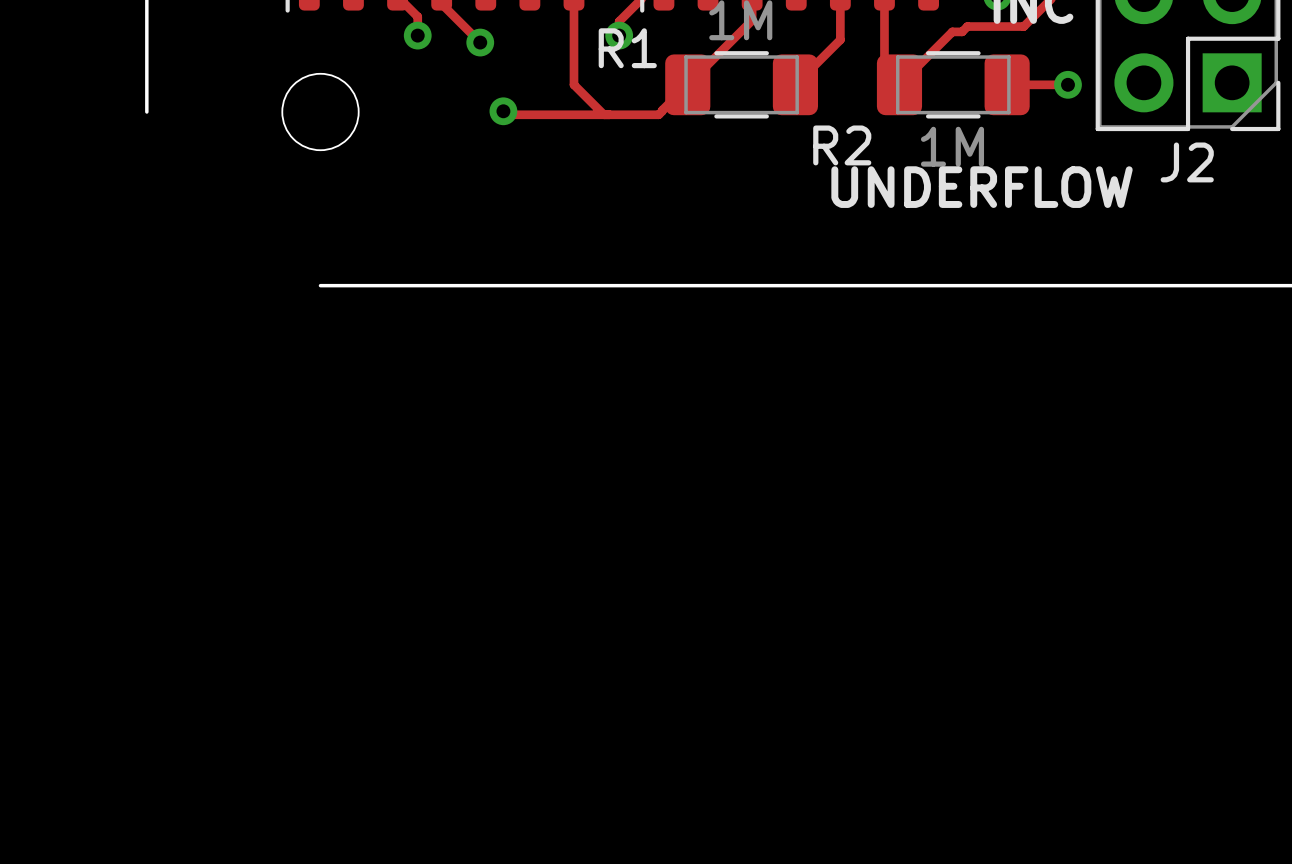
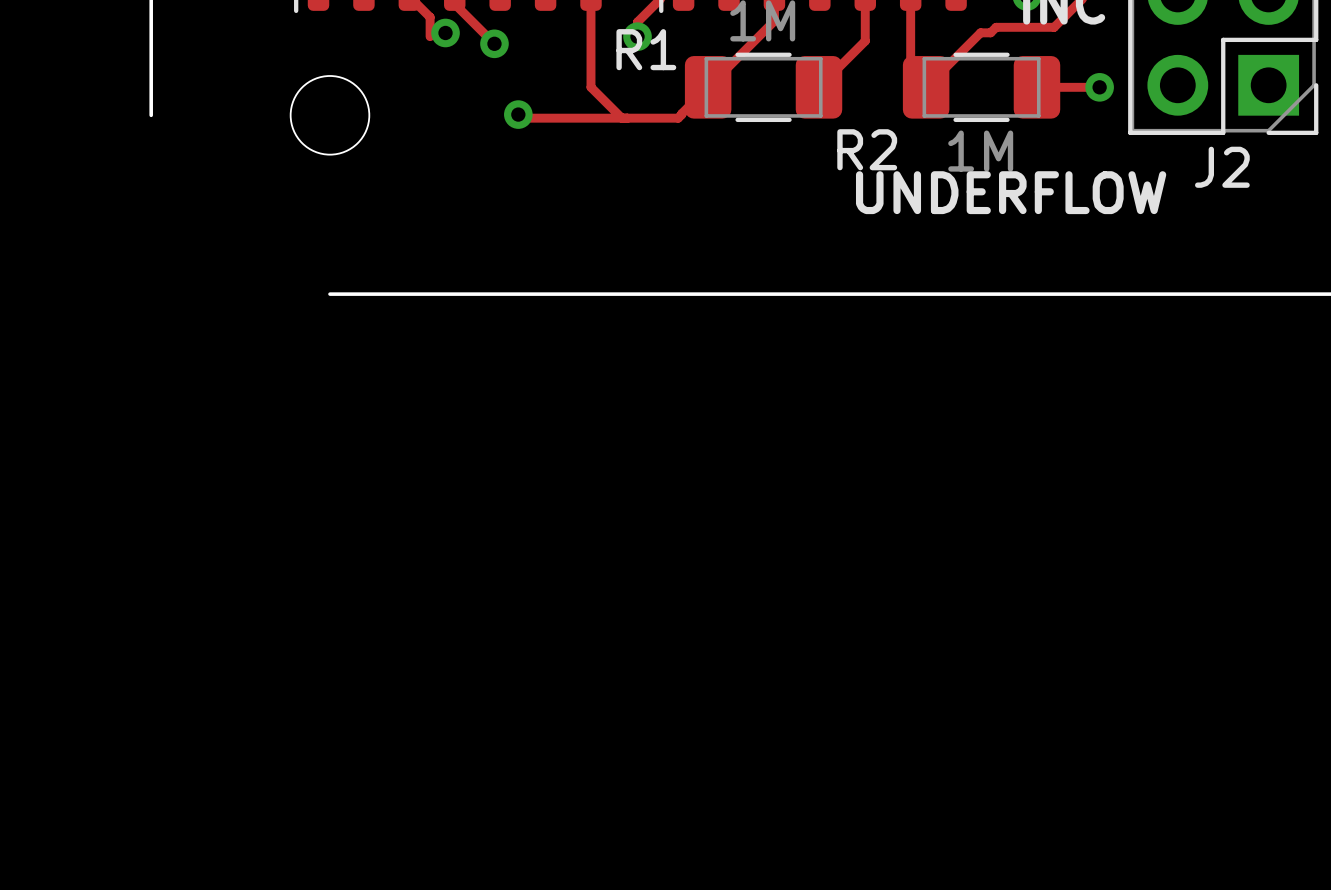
via position: (417, 35) -> (445, 32)

